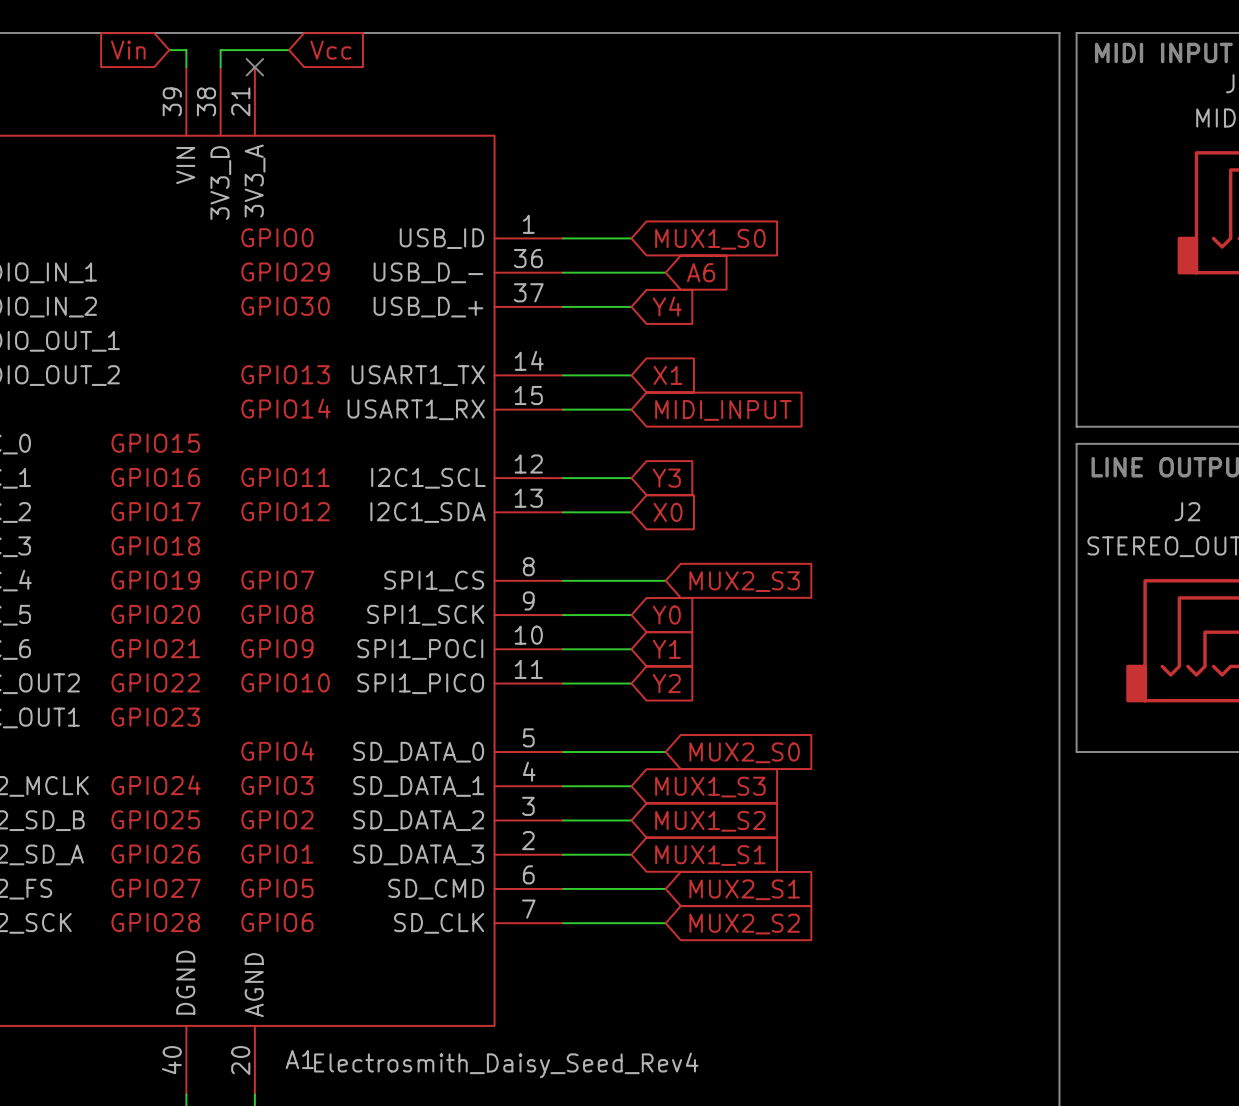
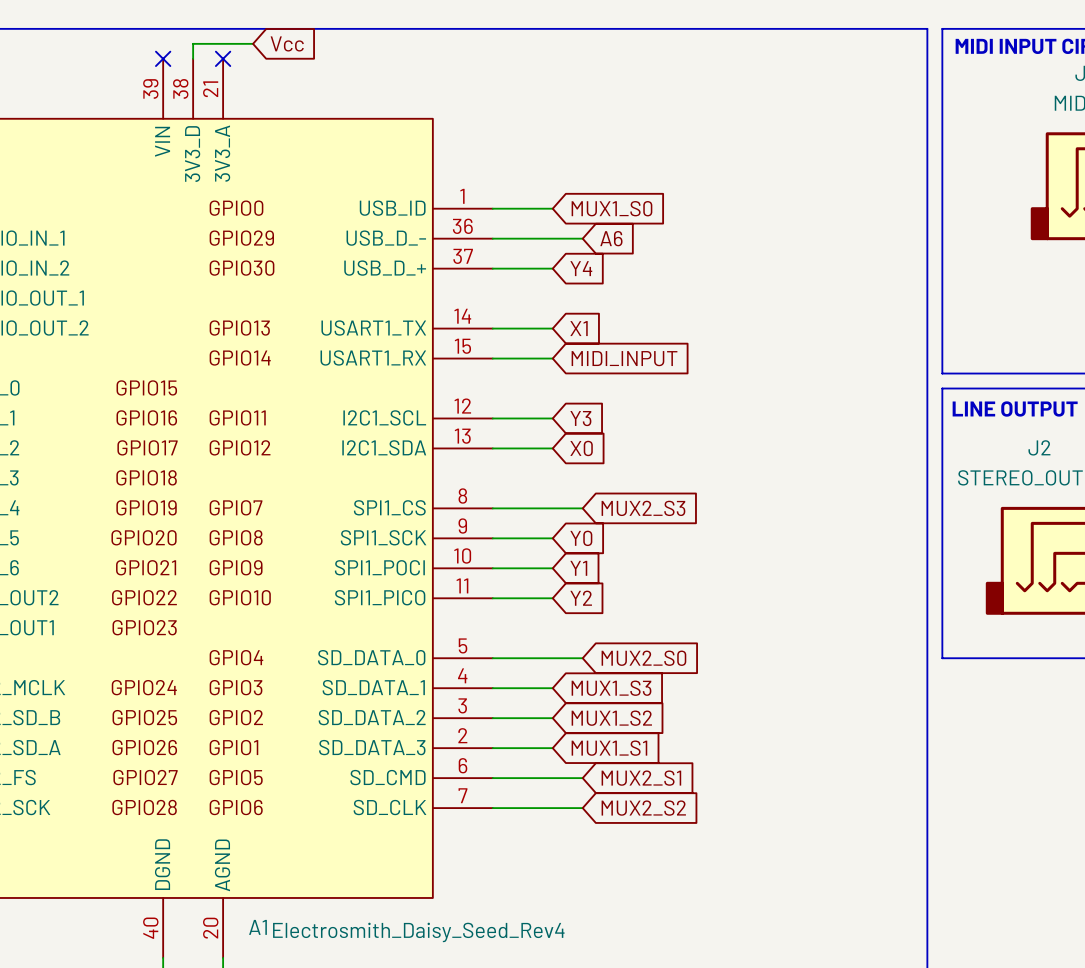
global label: Vin (128, 50) -> none
wire: (169, 50) (186, 50) (186, 67) -> none
no-connect mark: none -> (163, 58)

